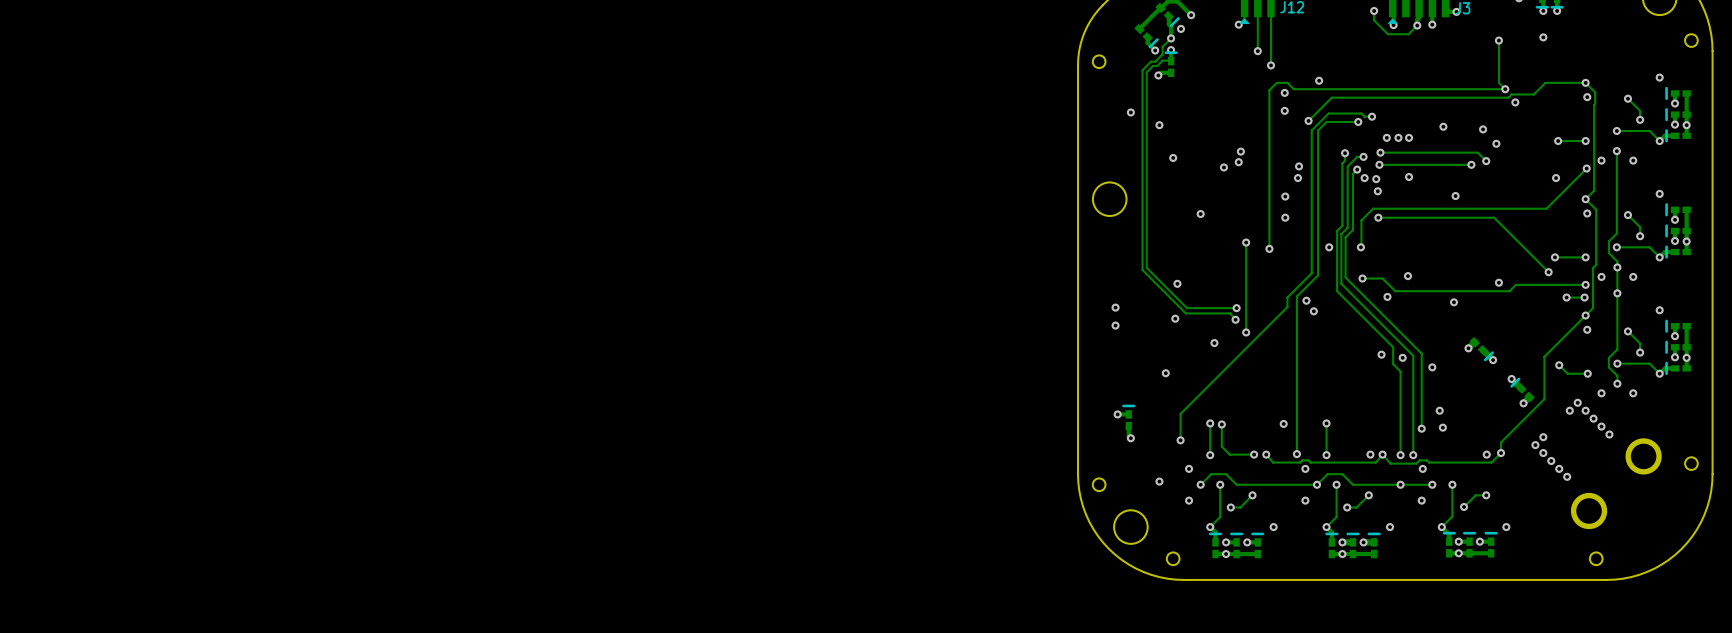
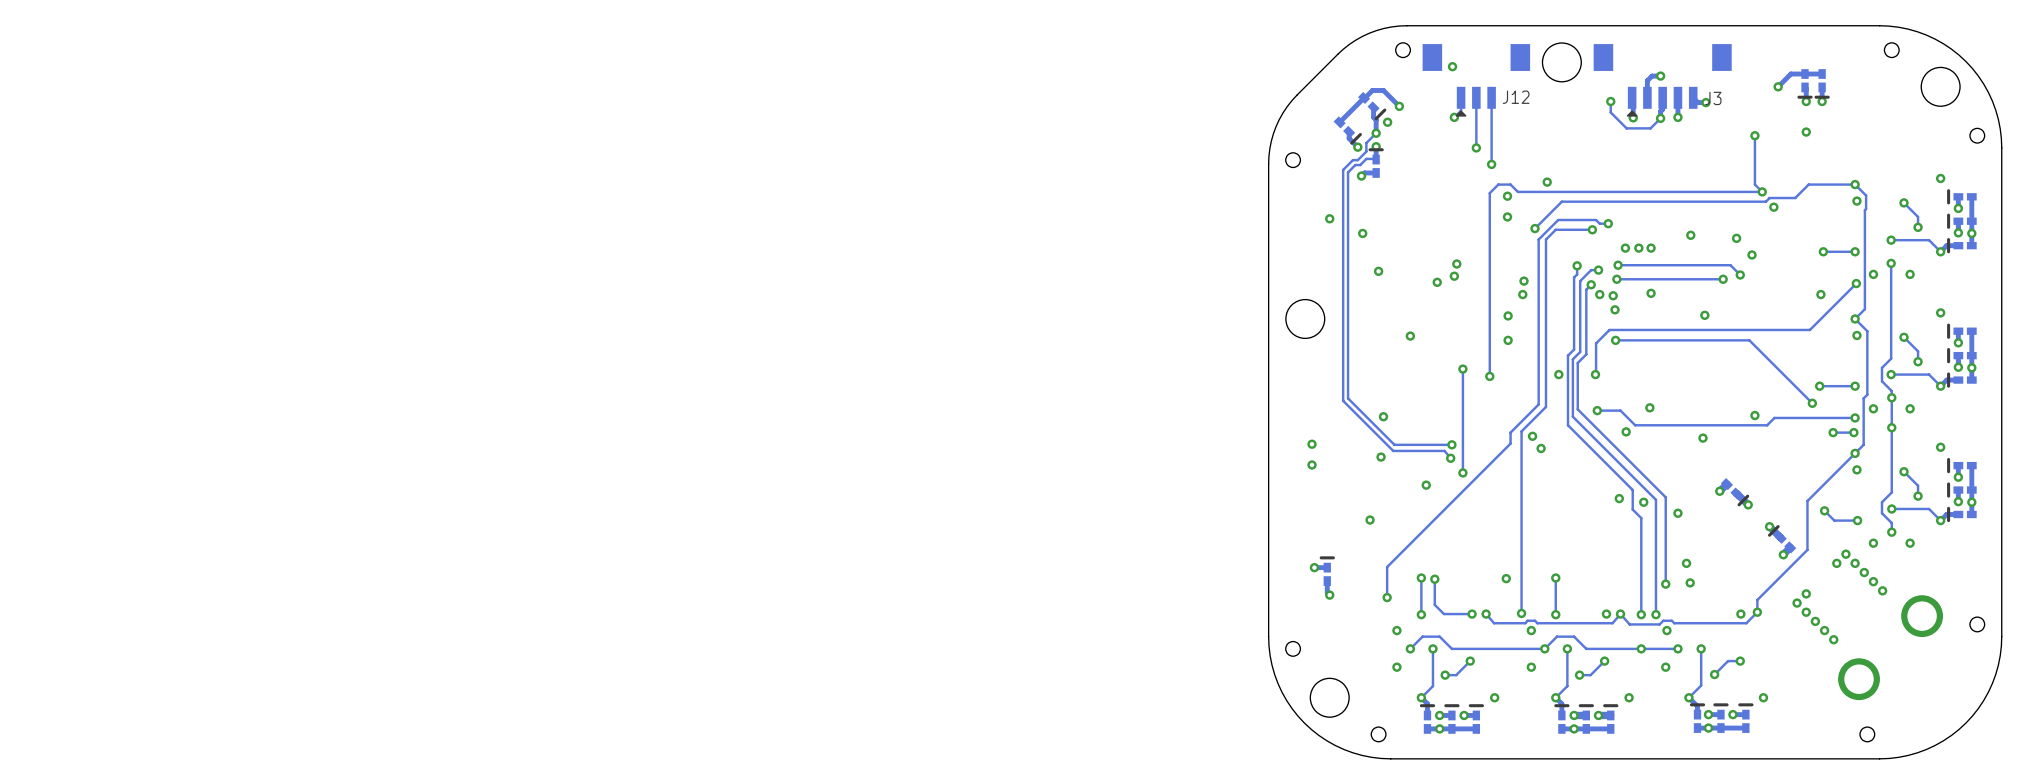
via: (1159, 481) -> none

